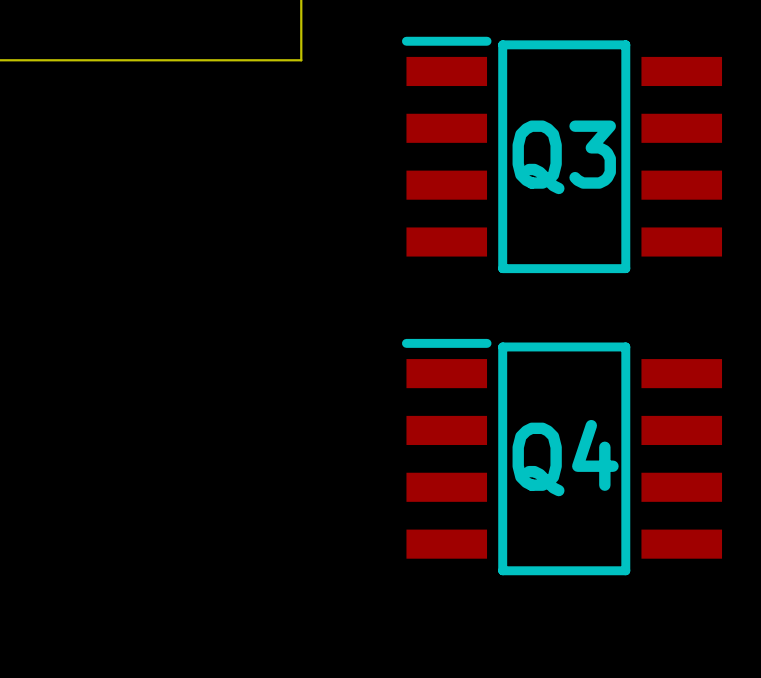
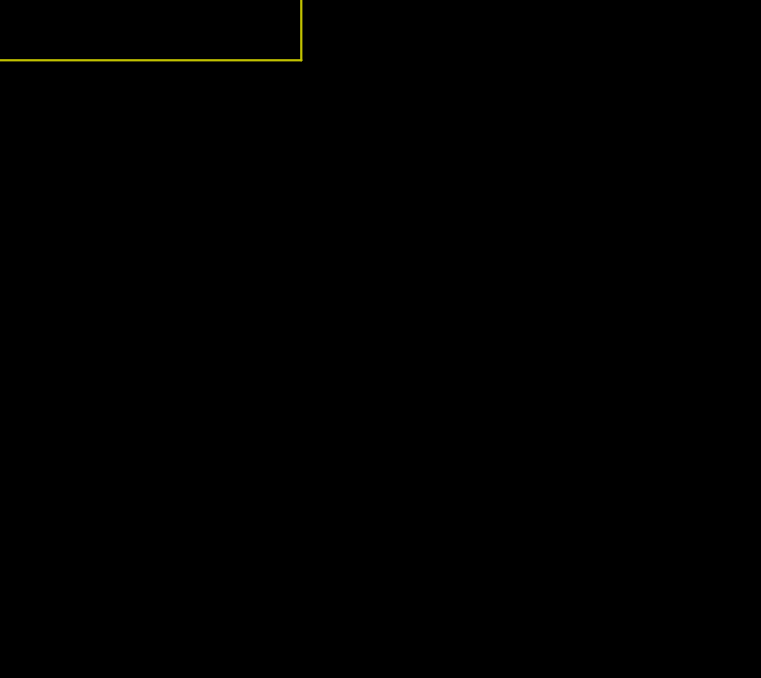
Q3: (562, 154) -> none
Q4: (562, 457) -> none

